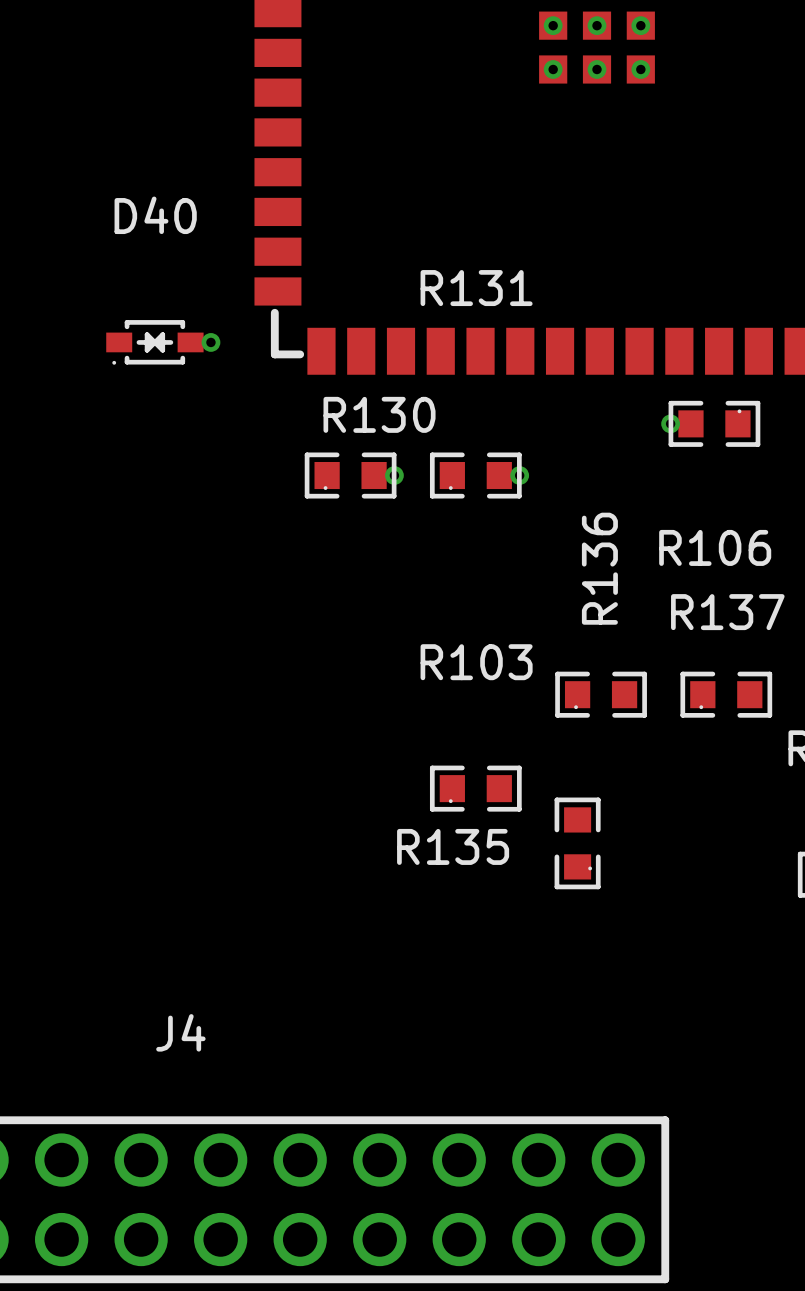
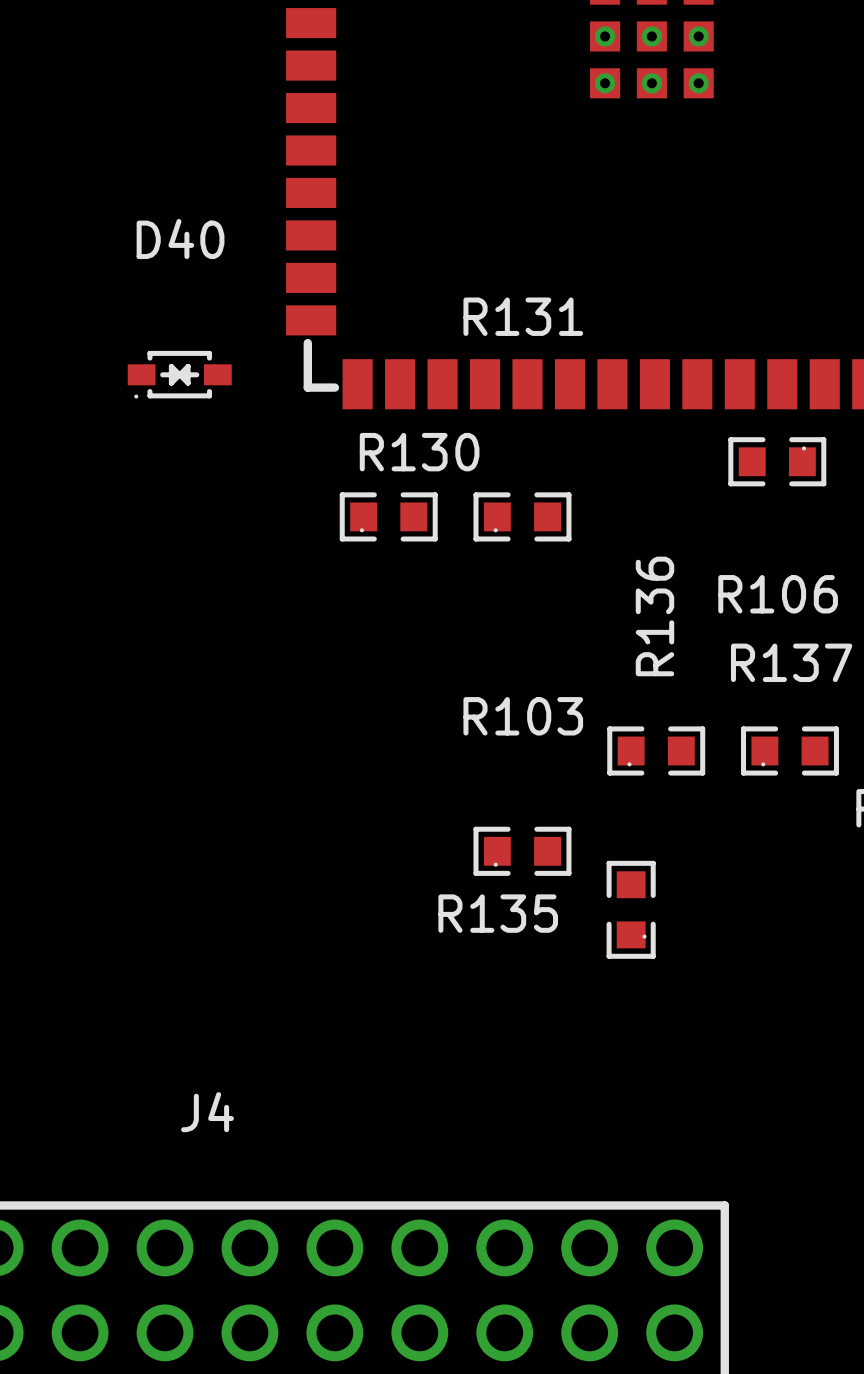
via: (210, 342) -> none
via: (670, 423) -> none
via: (394, 475) -> none
via: (519, 475) -> none

